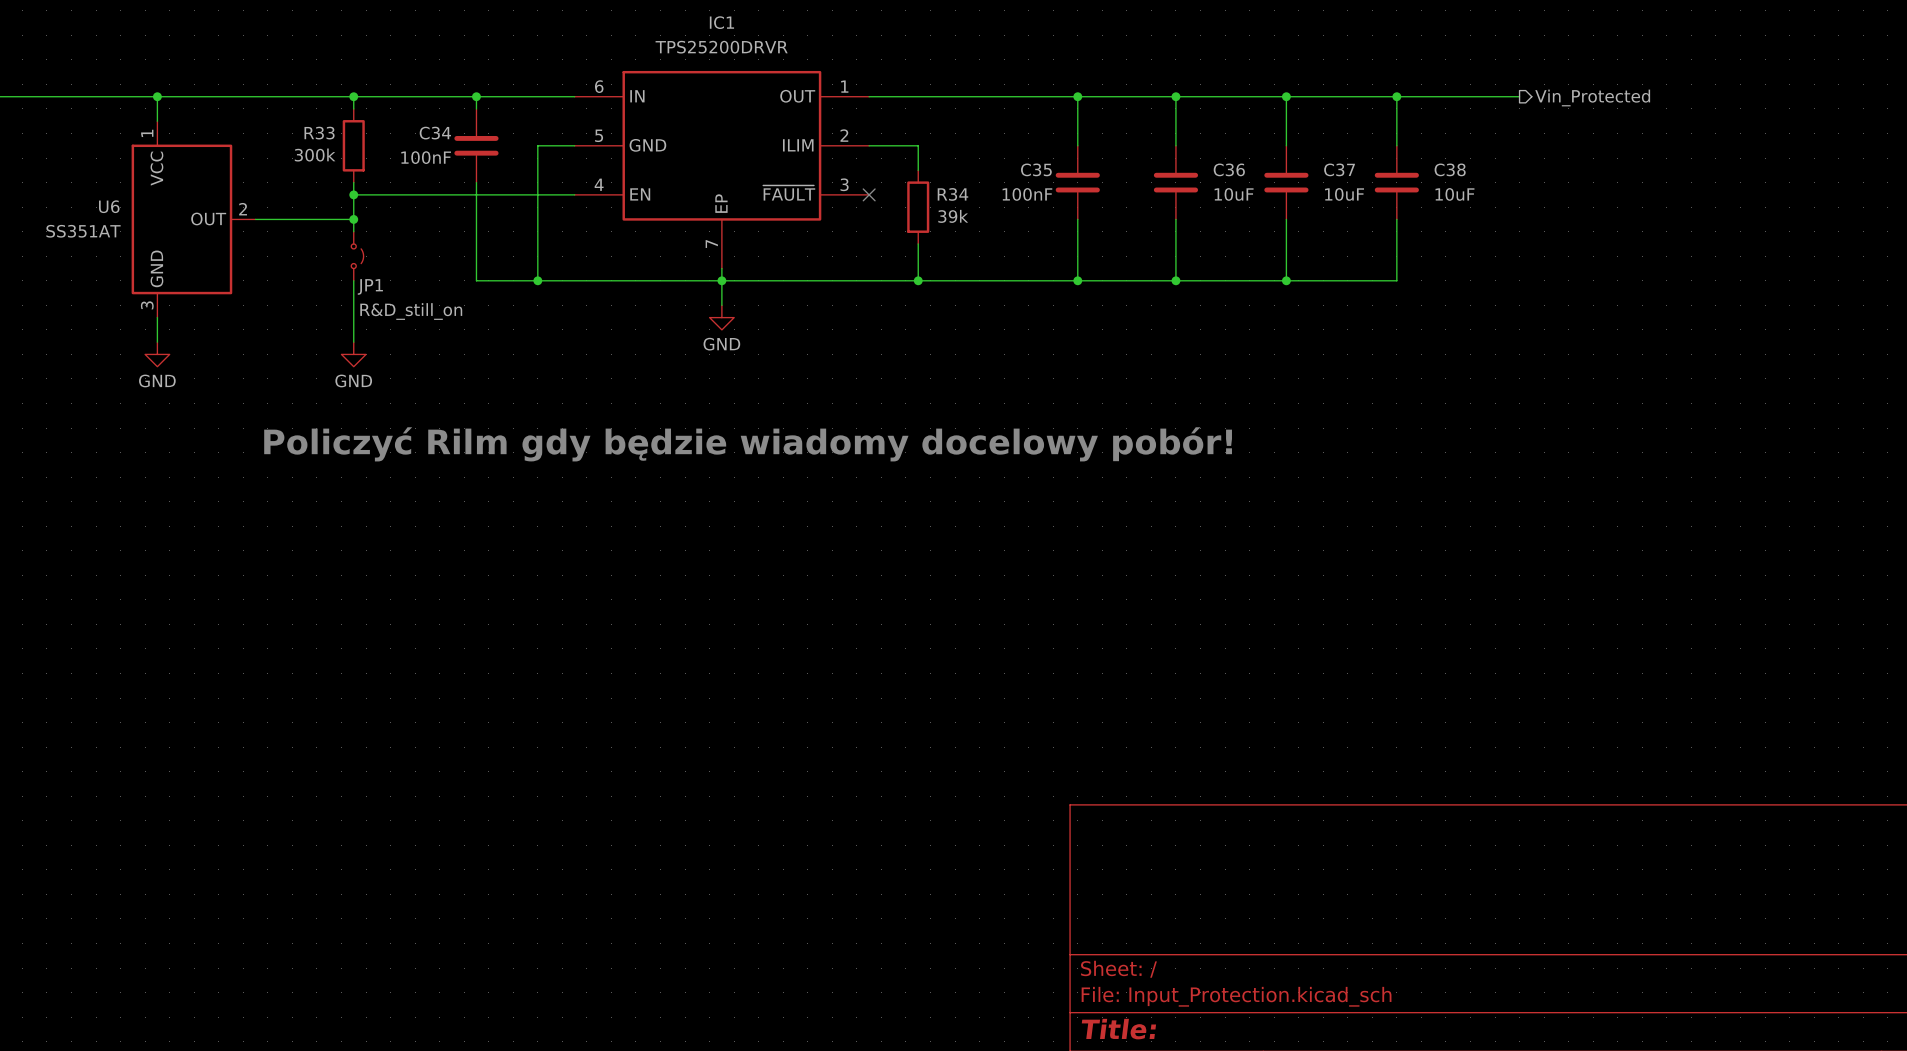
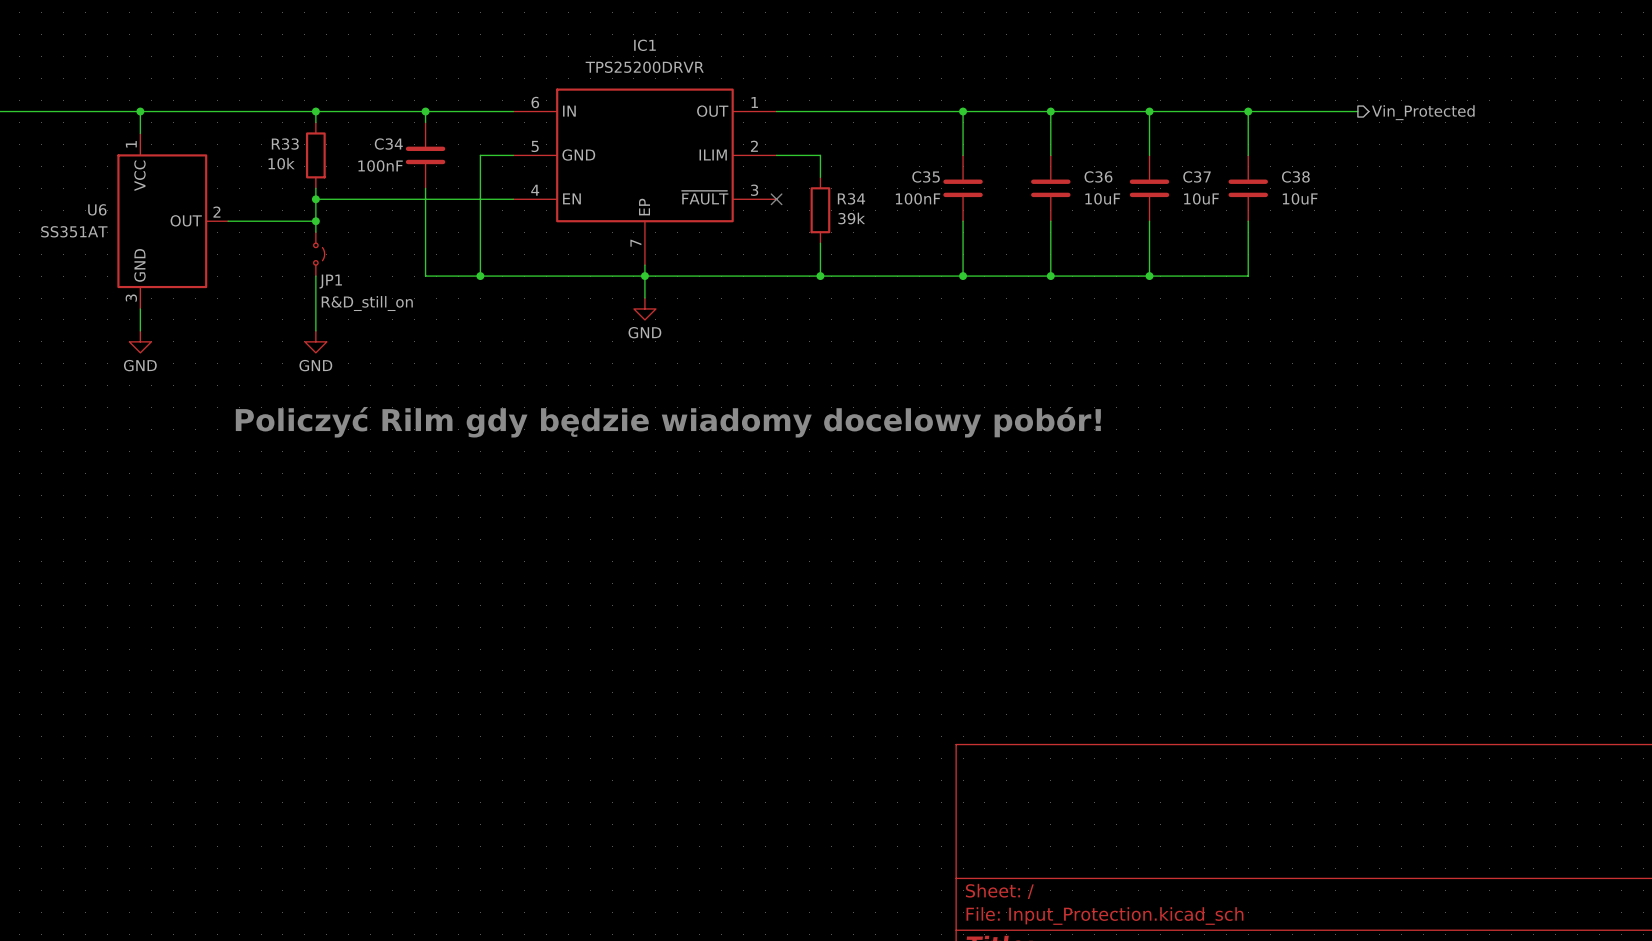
R33 value: 300k (315, 155) -> 10k (281, 163)

